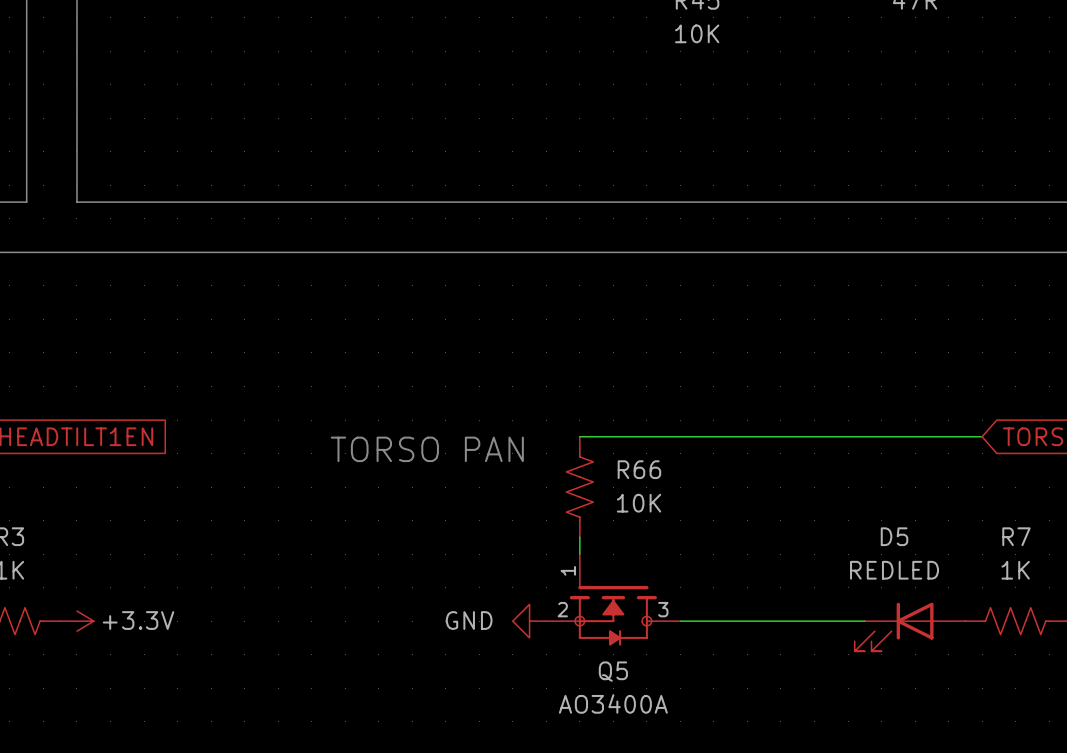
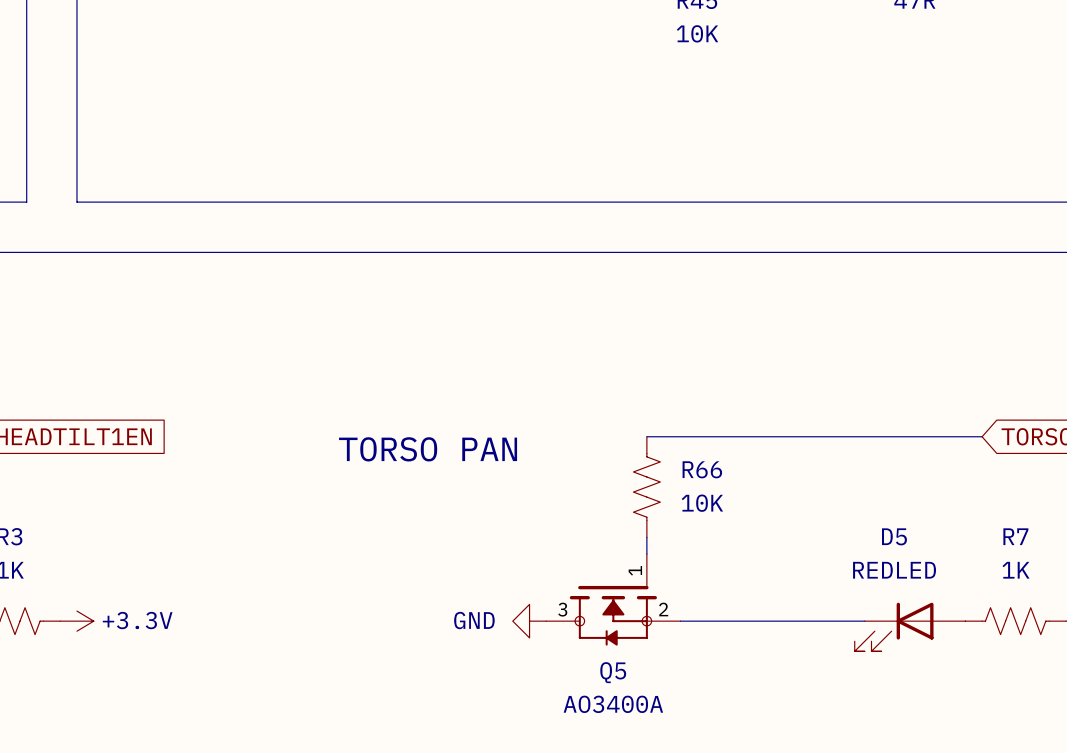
wire: (579, 436) (646, 436) -> none
R66 position: (579, 487) -> (646, 487)
wire: (579, 537) (579, 554) -> (646, 537) (646, 554)
Q5 flip: as is (613, 615) -> left-right (613, 615)

